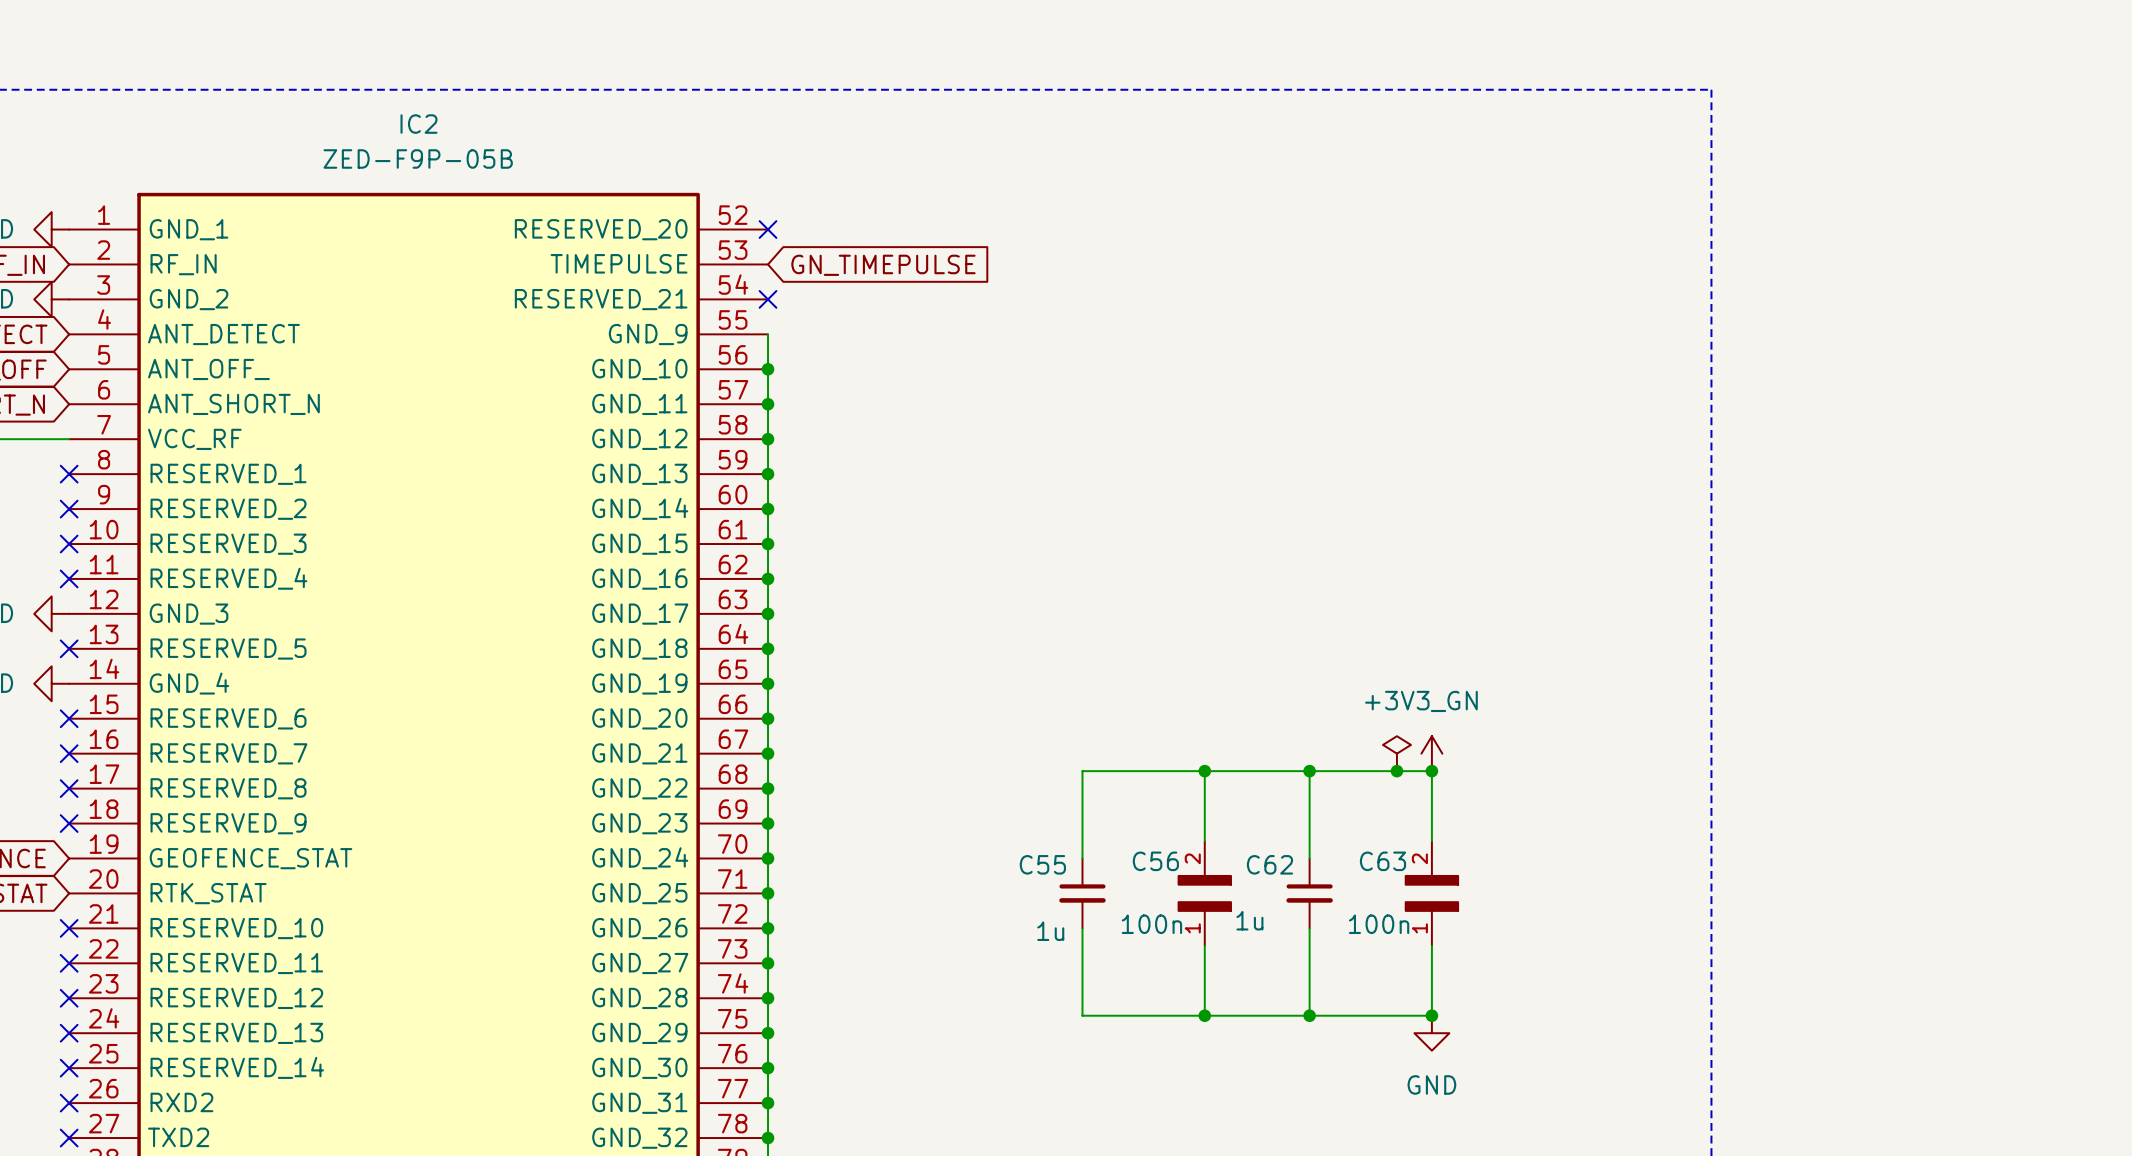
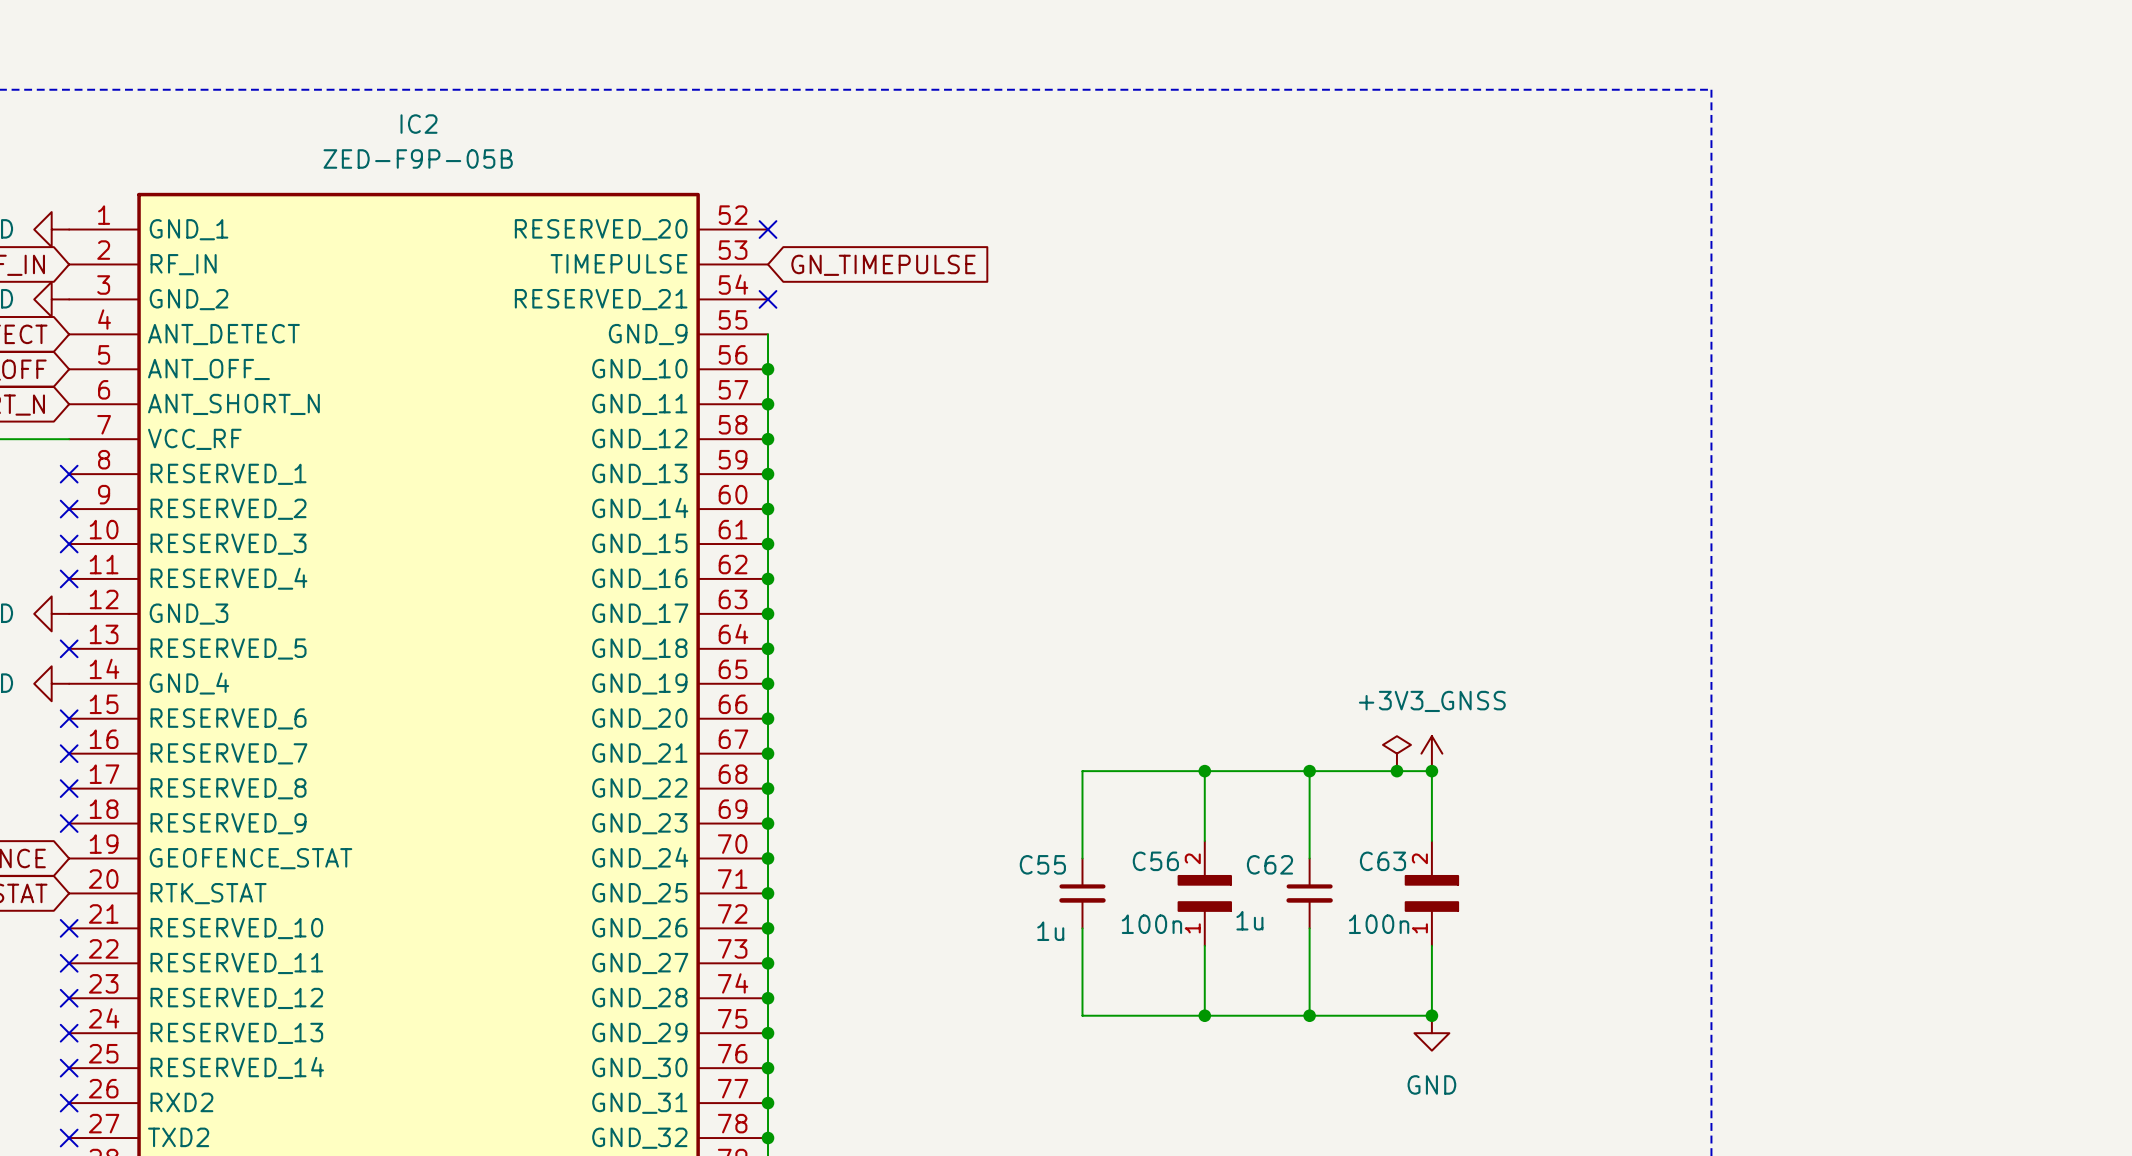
power symbol: +3V3_GN (1431, 753) -> +3V3_GNSS (1431, 753)

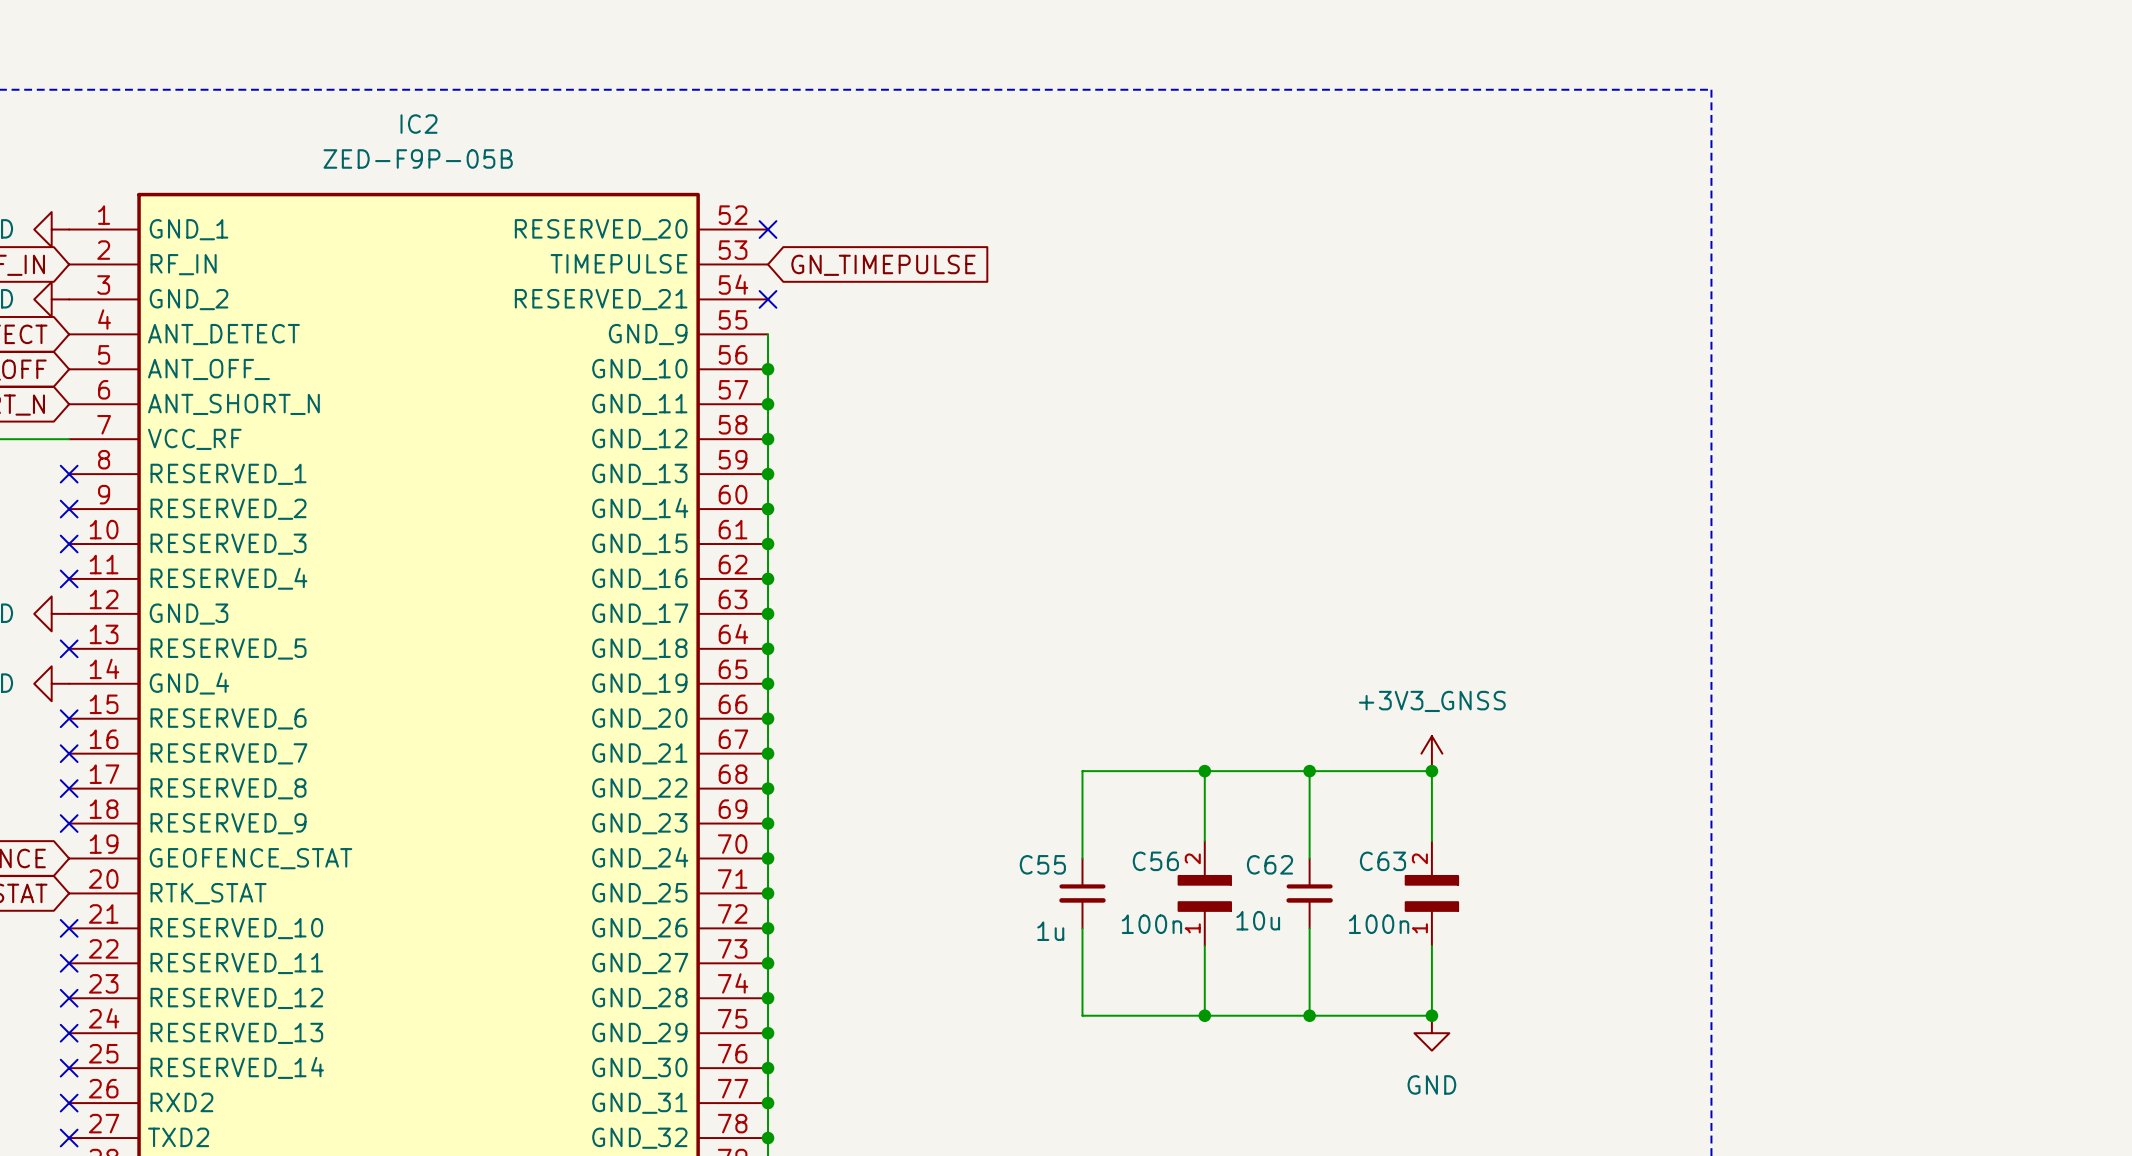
power symbol: (1396, 753) -> none
junction: (1396, 771) -> none
C62 value: 1u (1249, 920) -> 10u (1258, 920)

